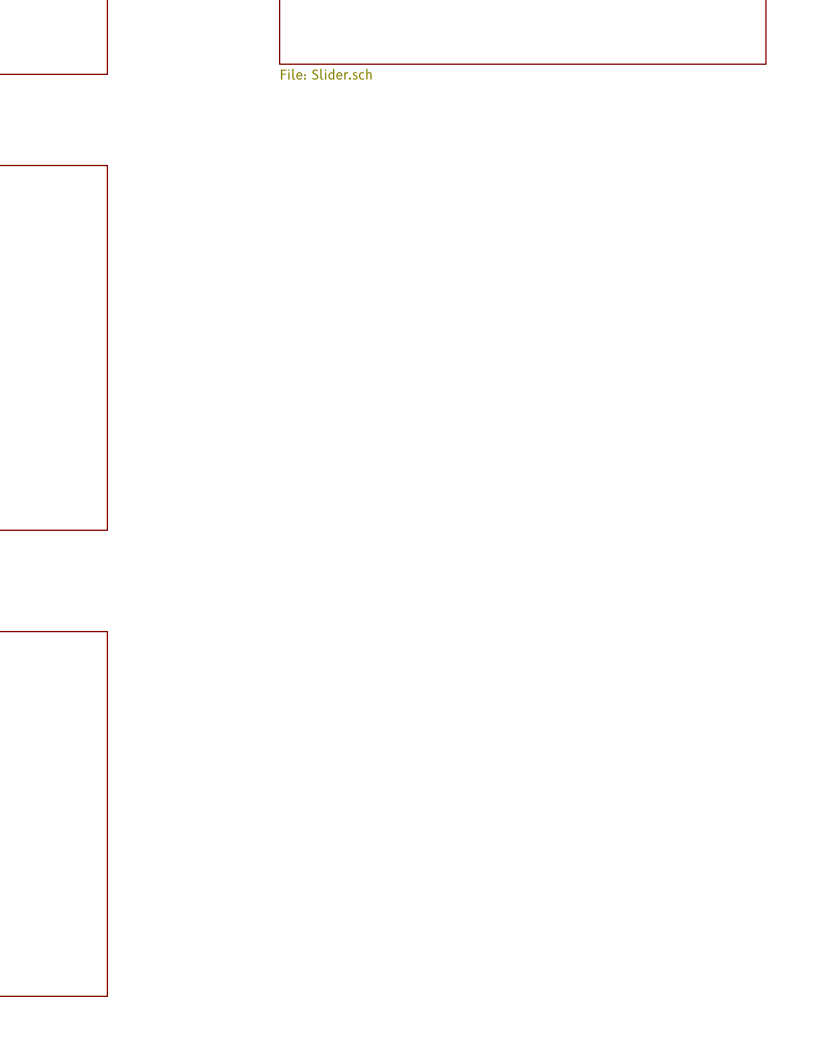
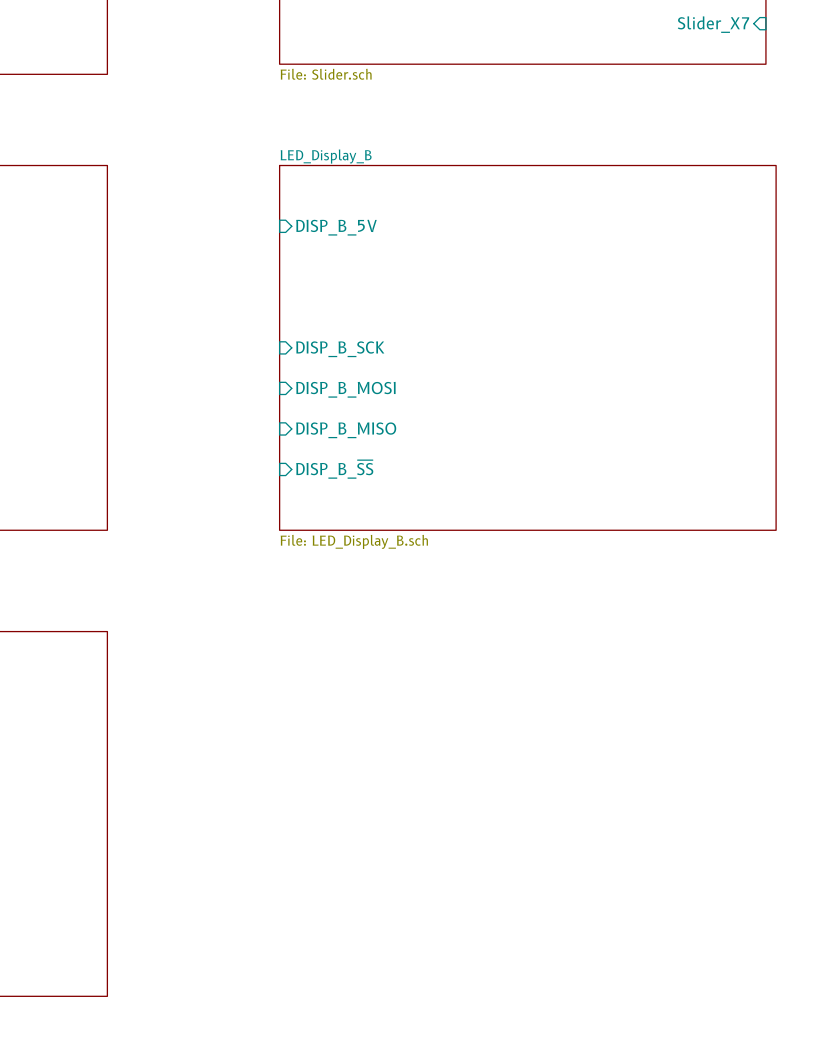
sheet pin: none -> Slider_X7 (713, 24)
sheet pin: none -> DISP_B_5V (336, 227)
sheet LED_Display_B: none -> File: LED_Display_B.sch (527, 347)
sheet pin: none -> DISP_B_SCK (340, 349)
sheet pin: none -> DISP_B_MOSI (345, 389)
sheet pin: none -> DISP_B_MISO (346, 430)
sheet pin: none -> DISP_B_~{SS} (334, 469)

